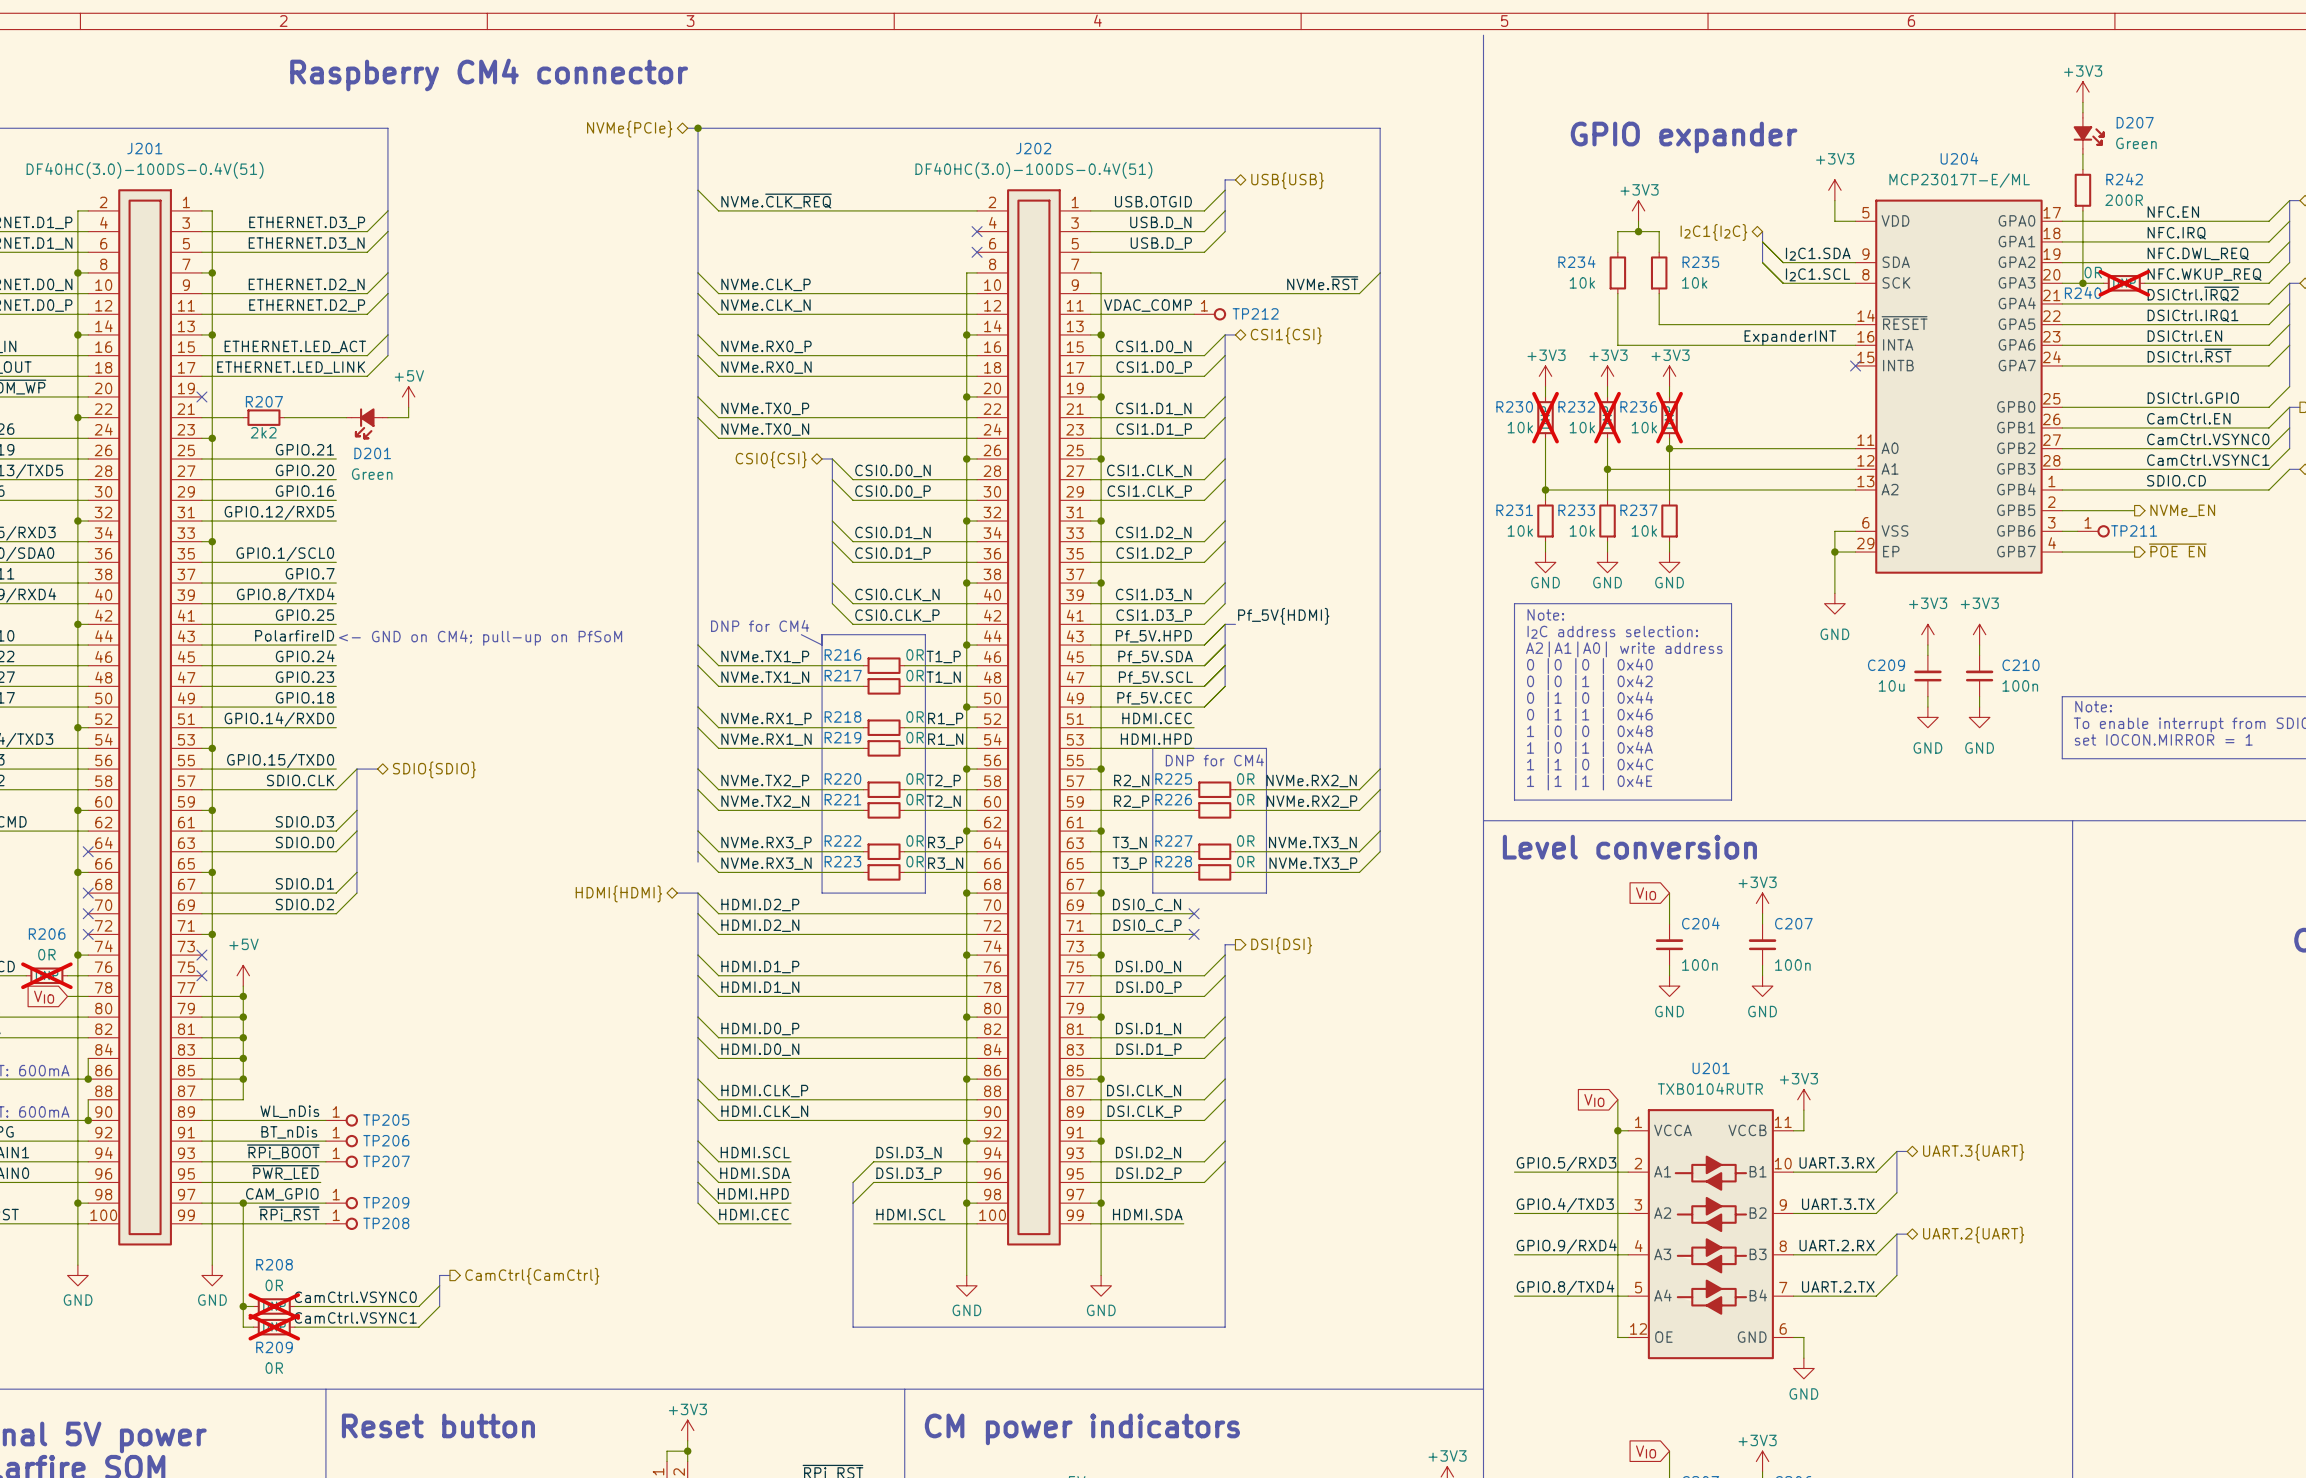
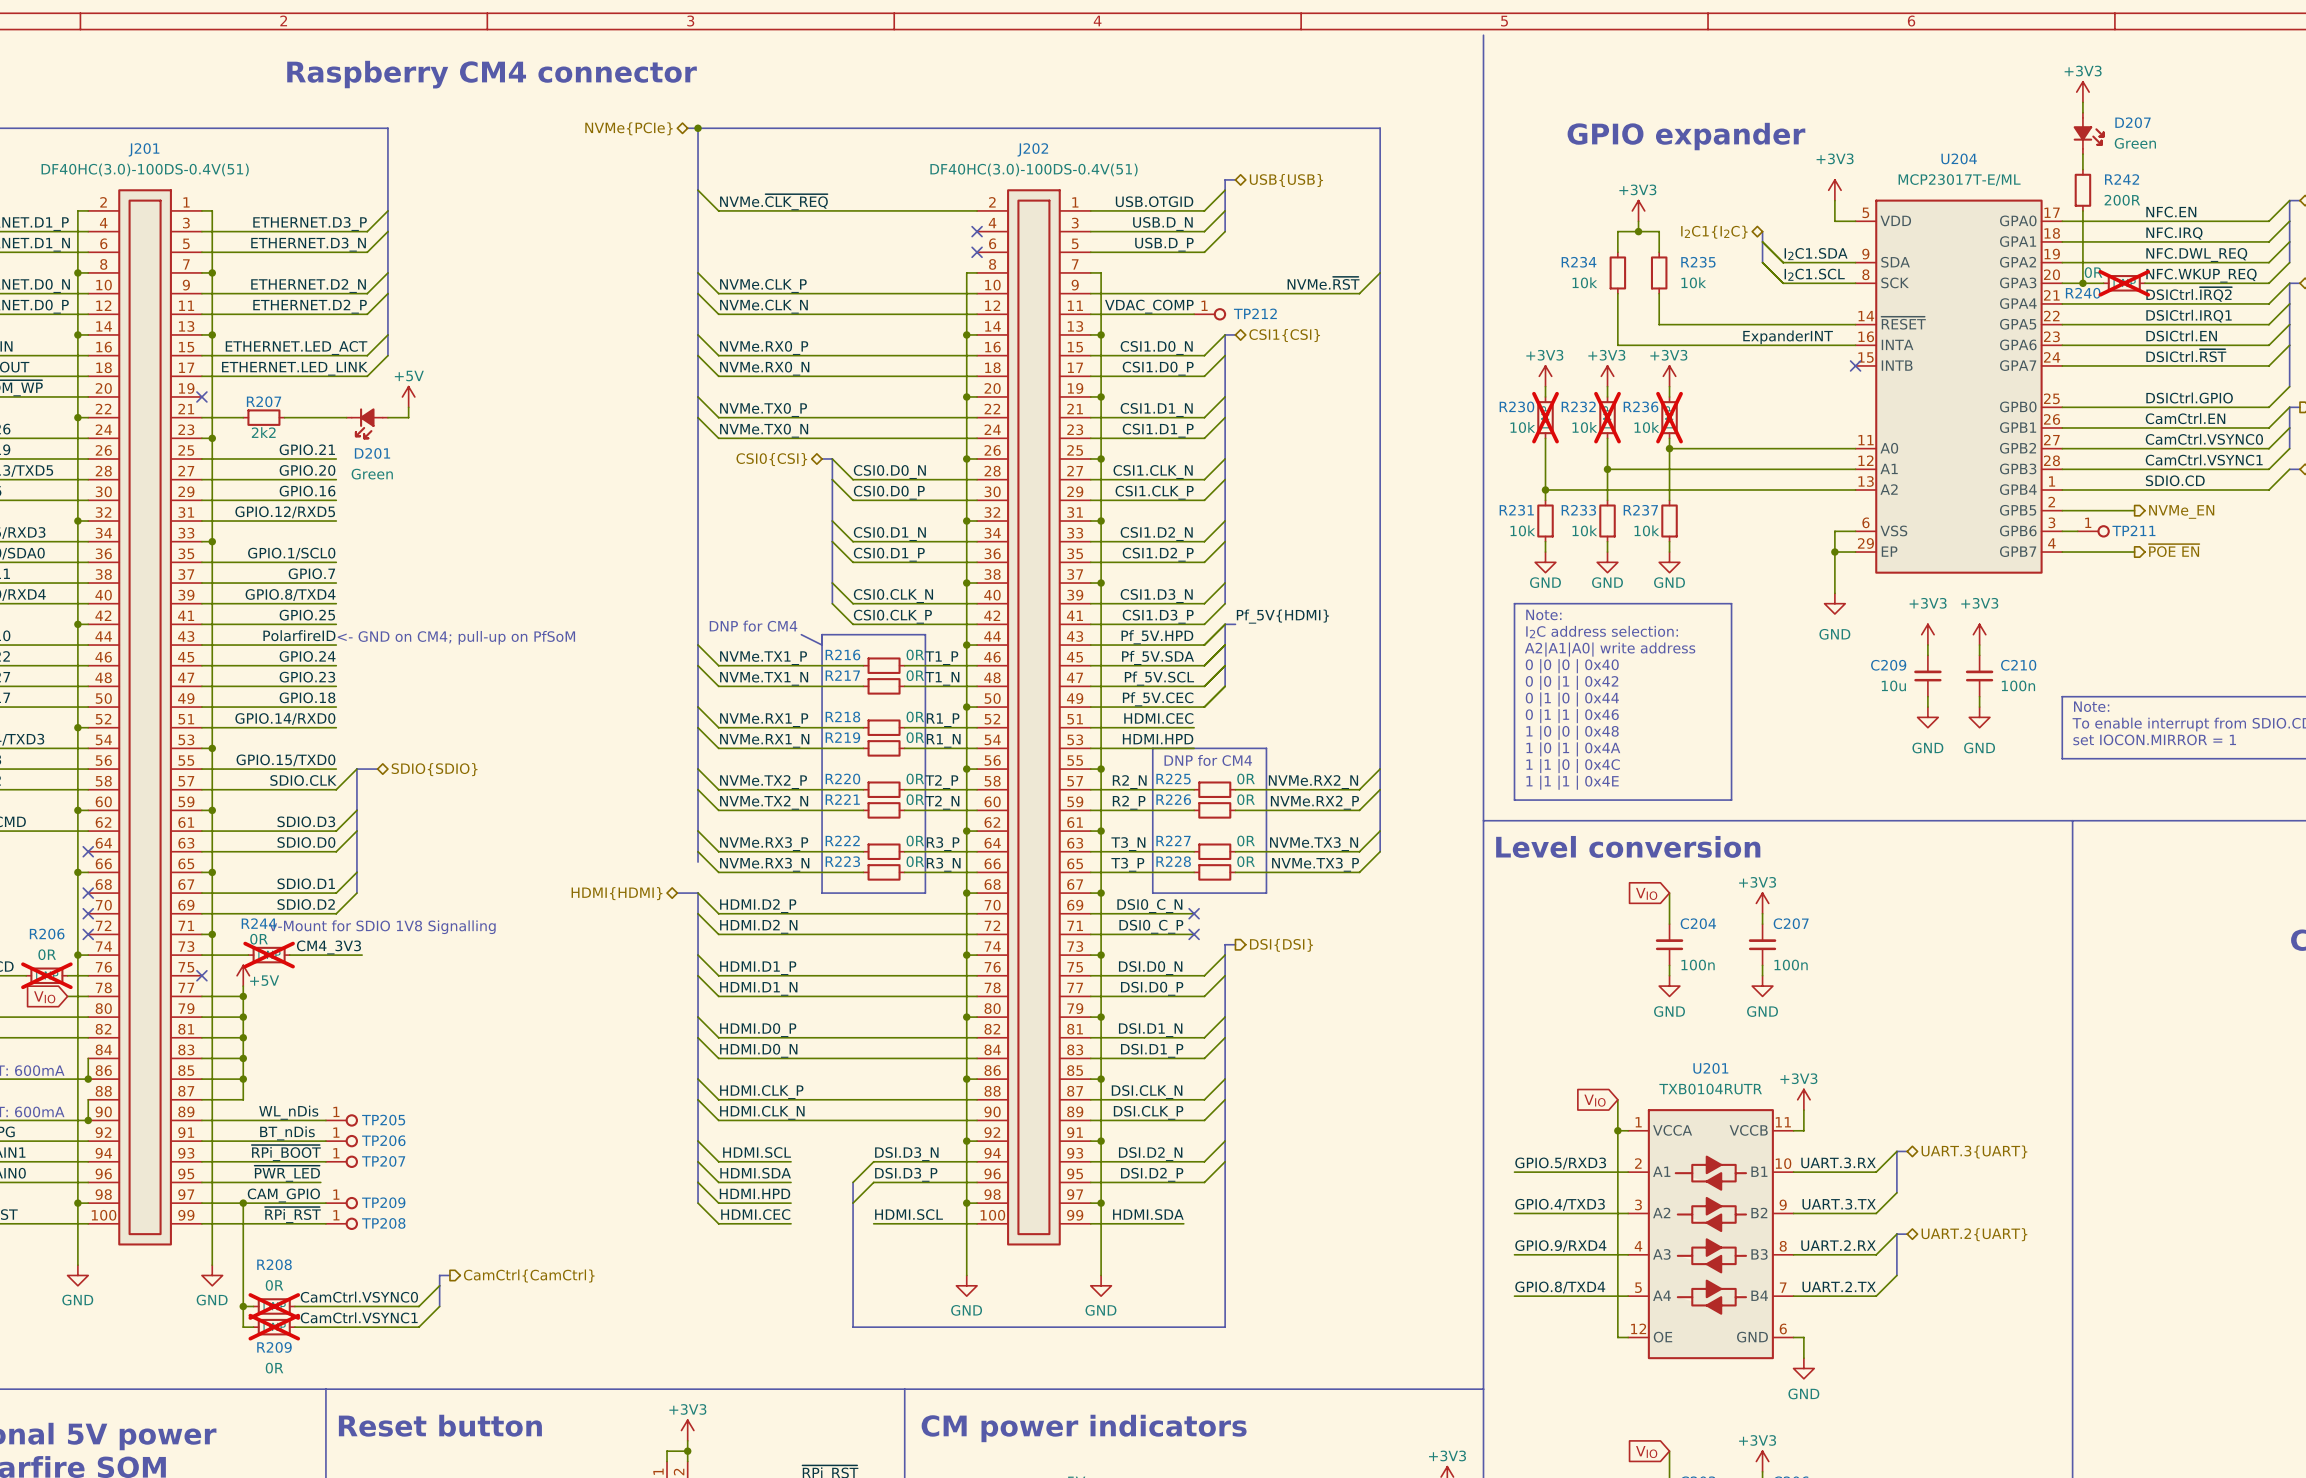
text: none -> v-Mount for SDIO 1V8 Signalling (382, 927)
power symbol text position: +5V (244, 944) -> +5V (264, 980)
label: none -> CM4_3V3 (328, 947)
wire: none -> (201, 955) (248, 955)
no-connect mark: (201, 955) -> none
R244: none -> (269, 955)
wire: none -> (289, 955) (362, 955)

